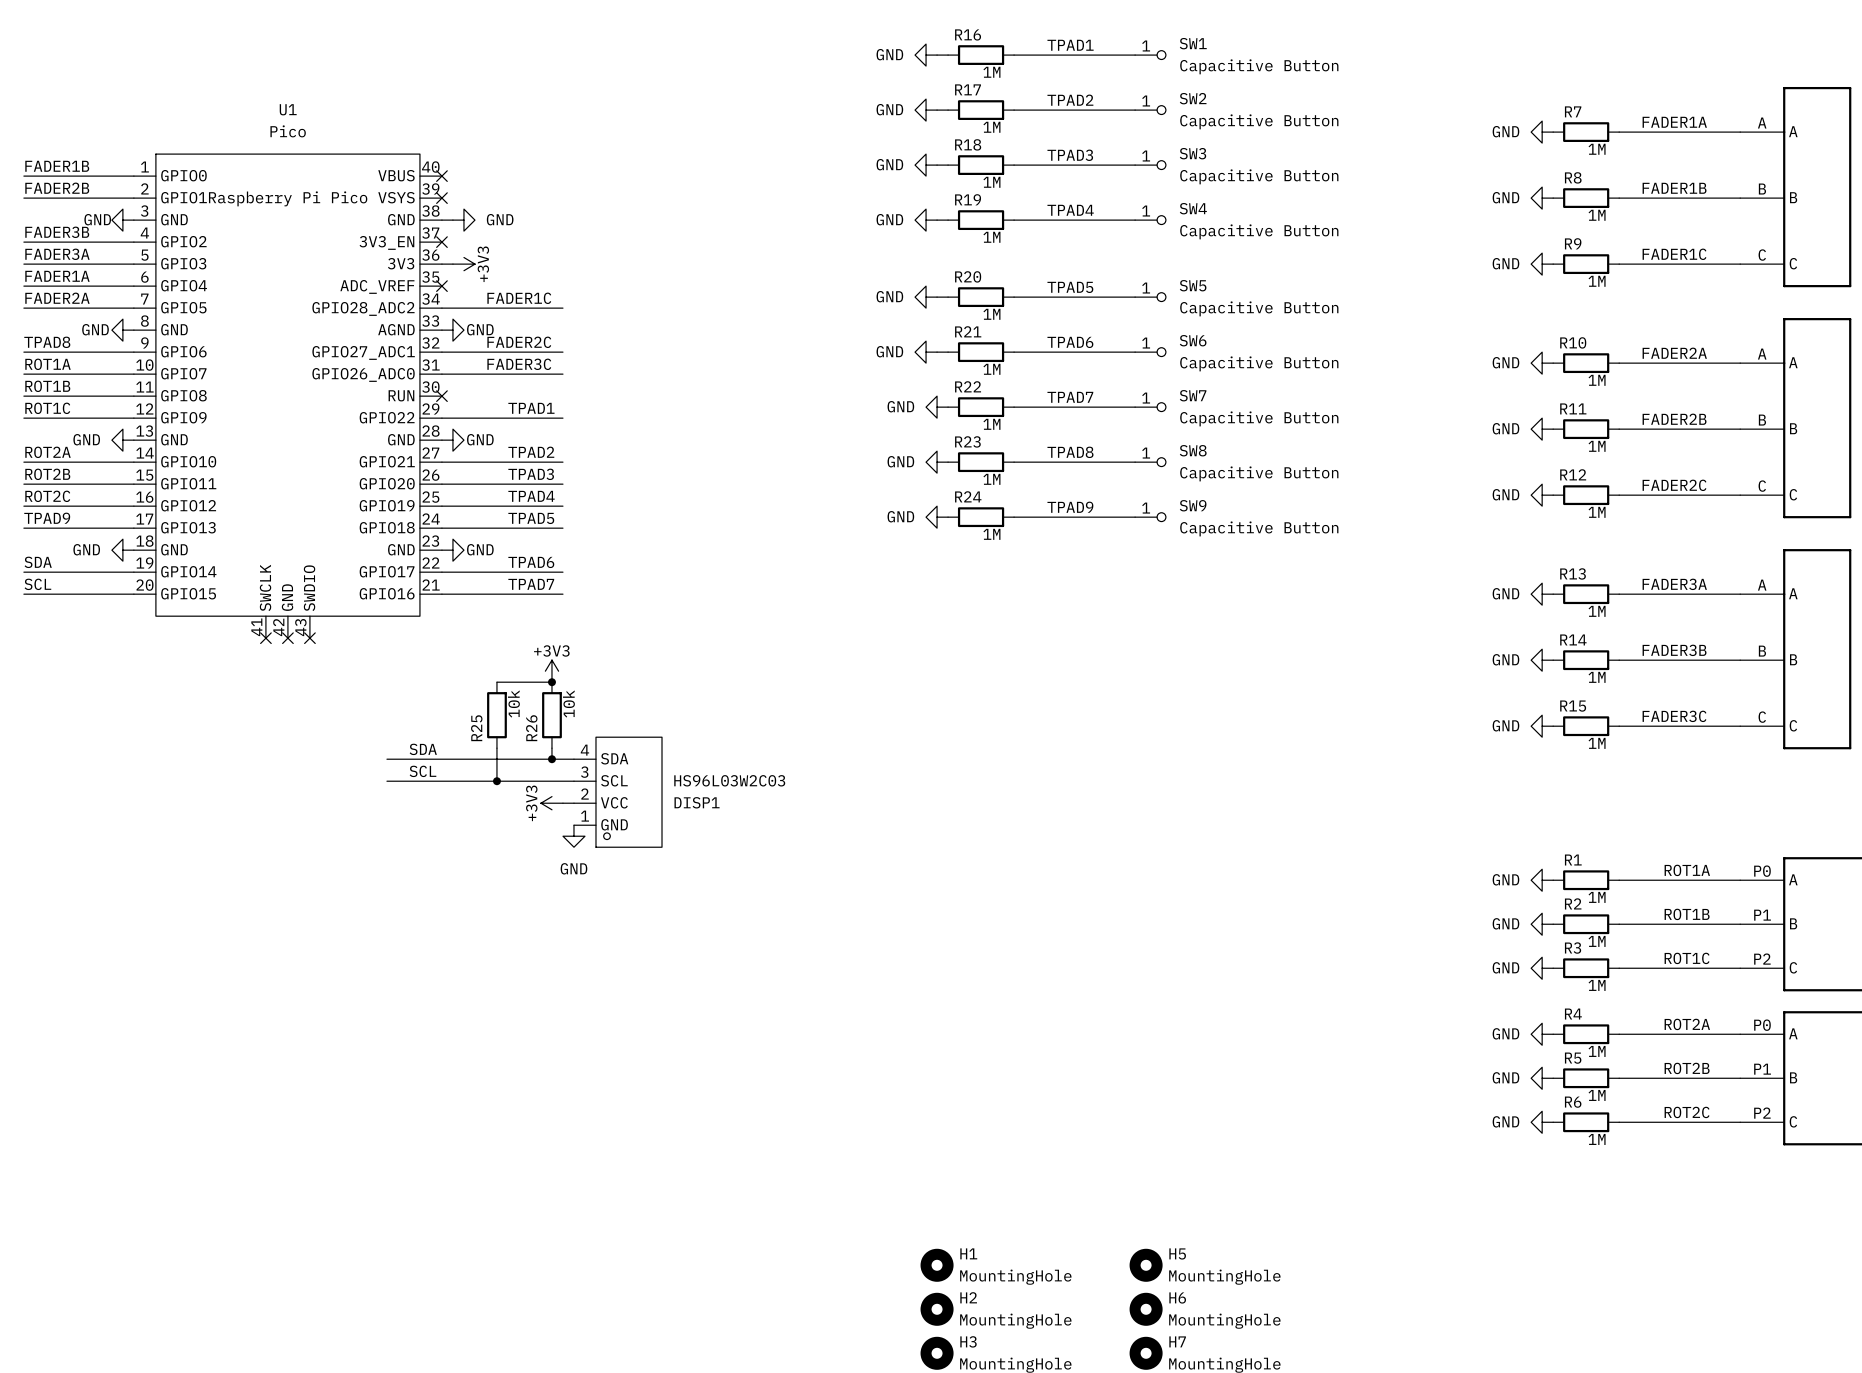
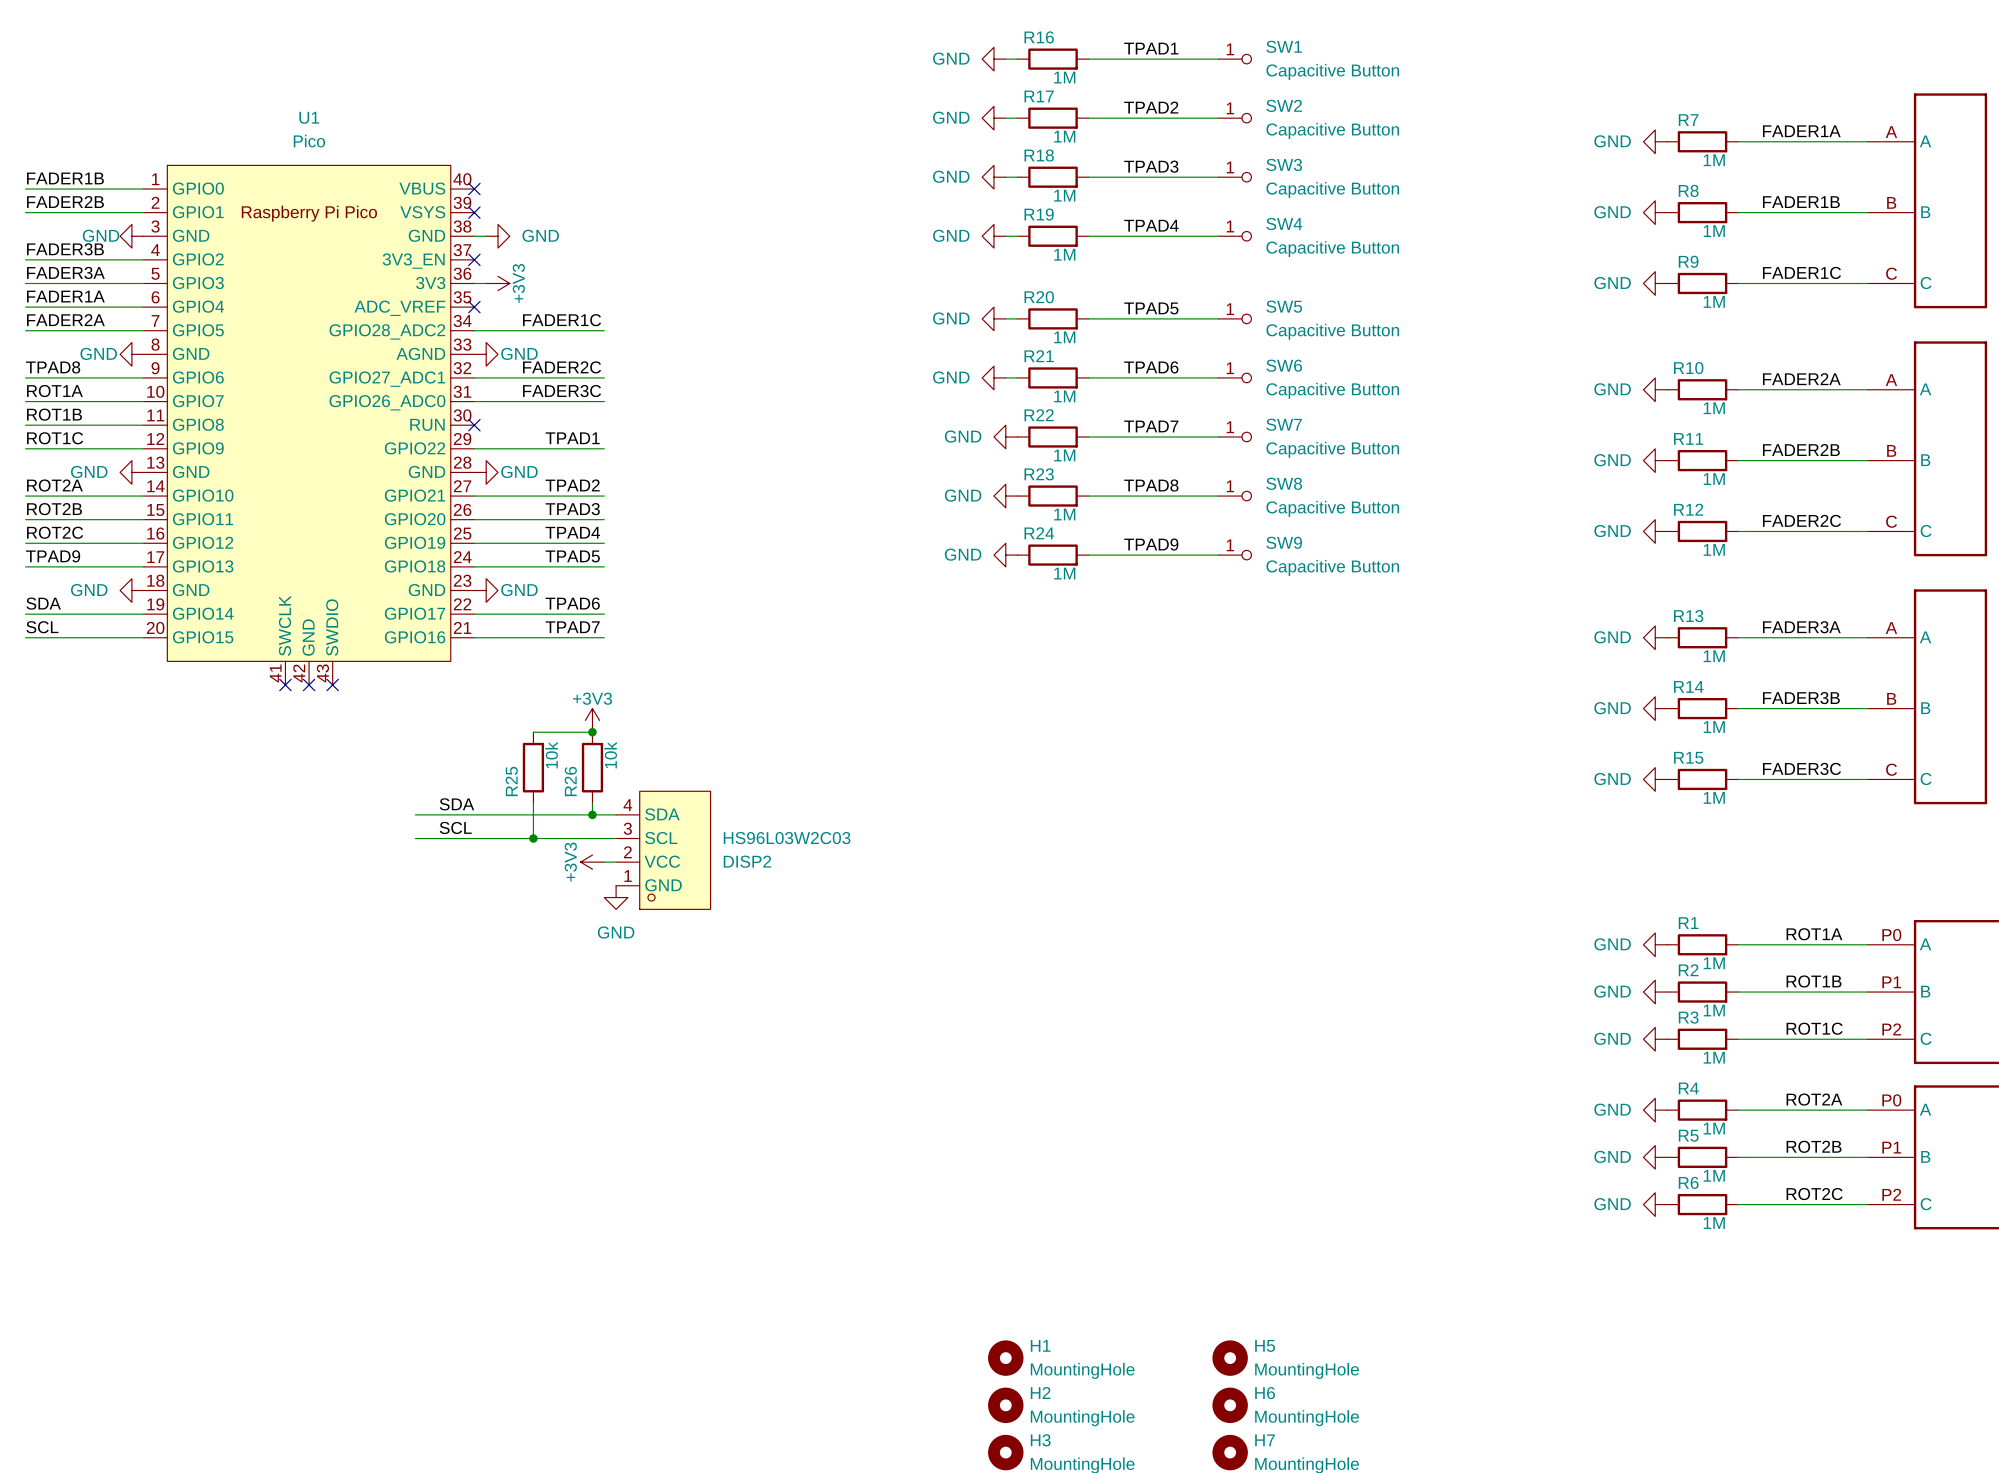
DISP1 name: DISP1 (697, 802) -> DISP2 (747, 861)

